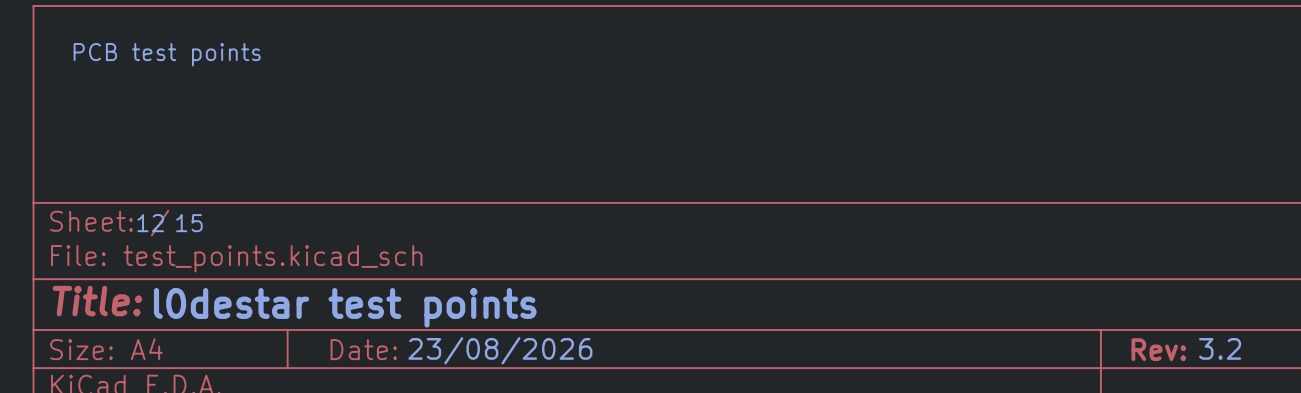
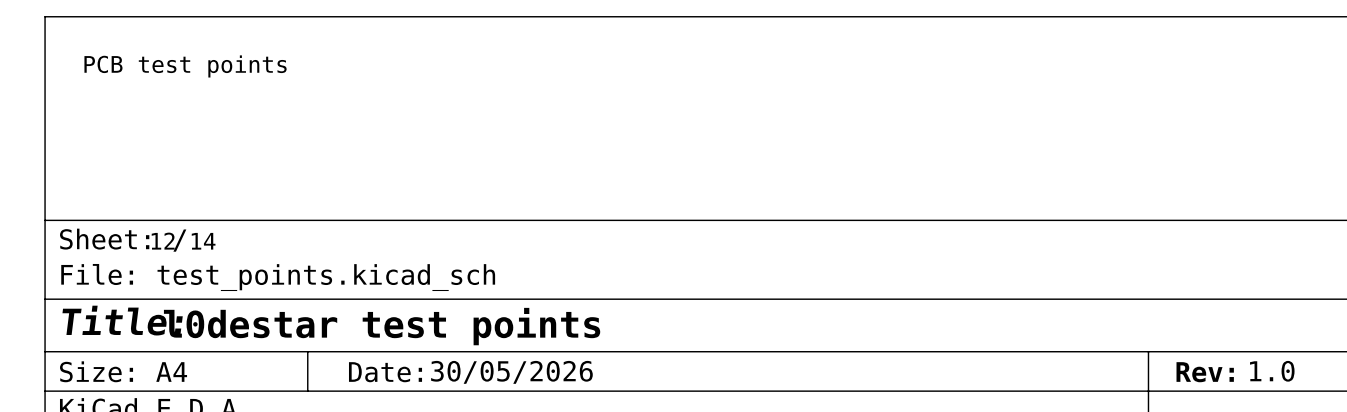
text: 15 (189, 223) -> 14 (203, 241)
text: 3.2 (1220, 348) -> 1.0 (1272, 371)
text: 23/08/2026 (500, 350) -> 30/05/2026 (511, 372)

